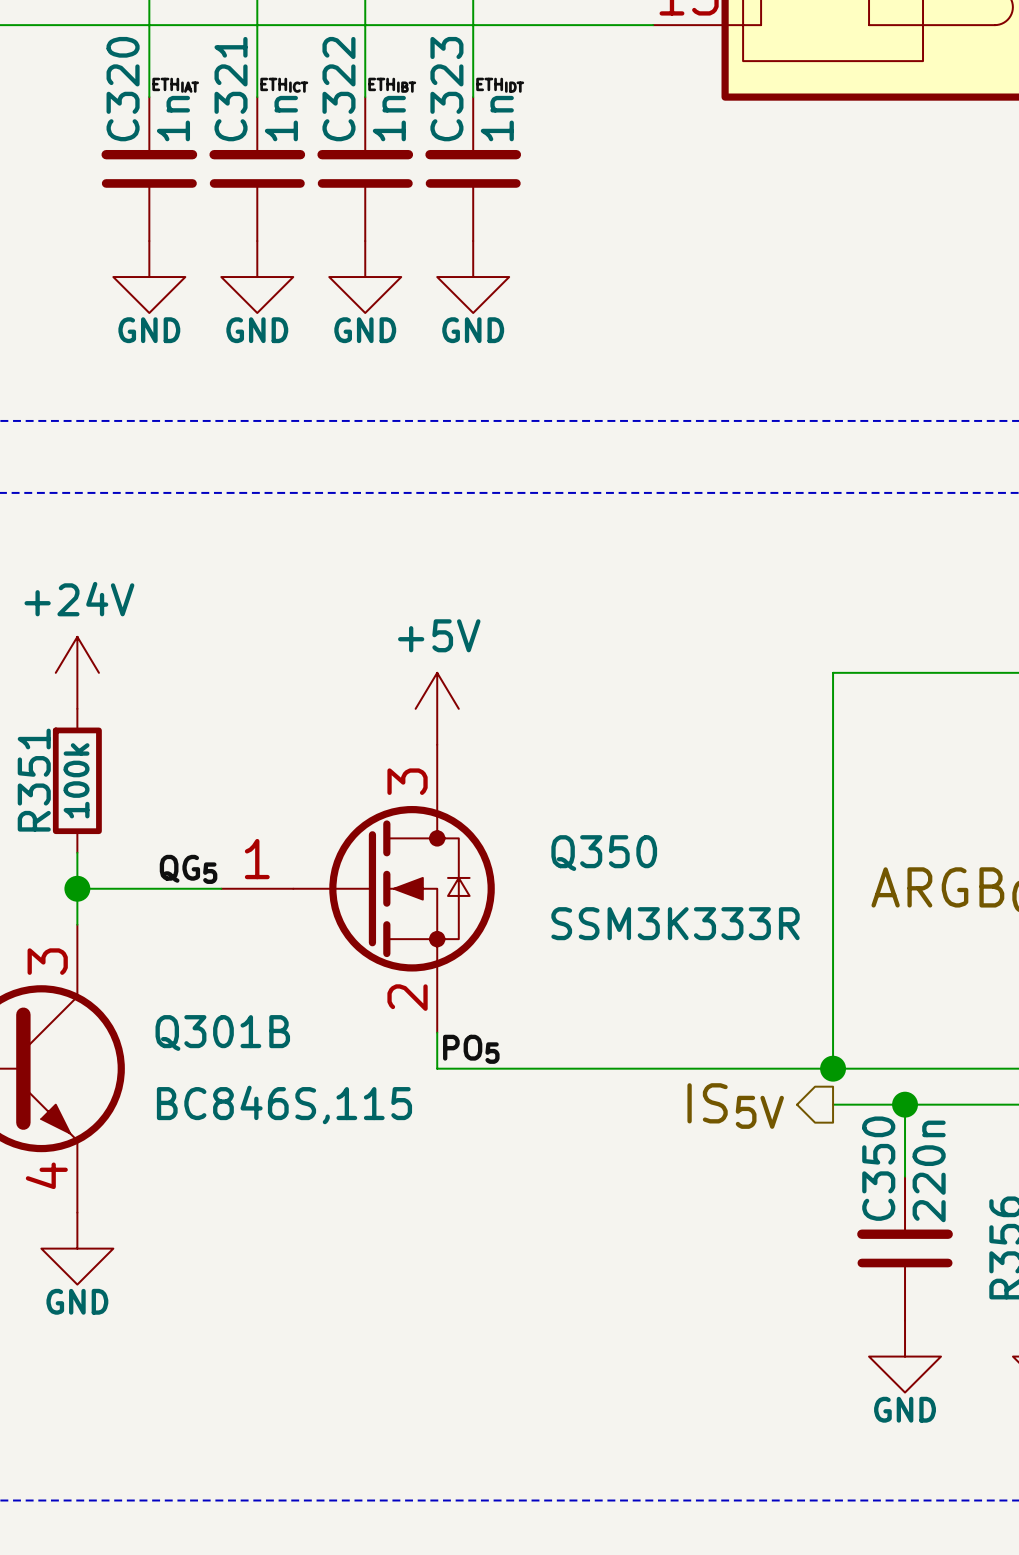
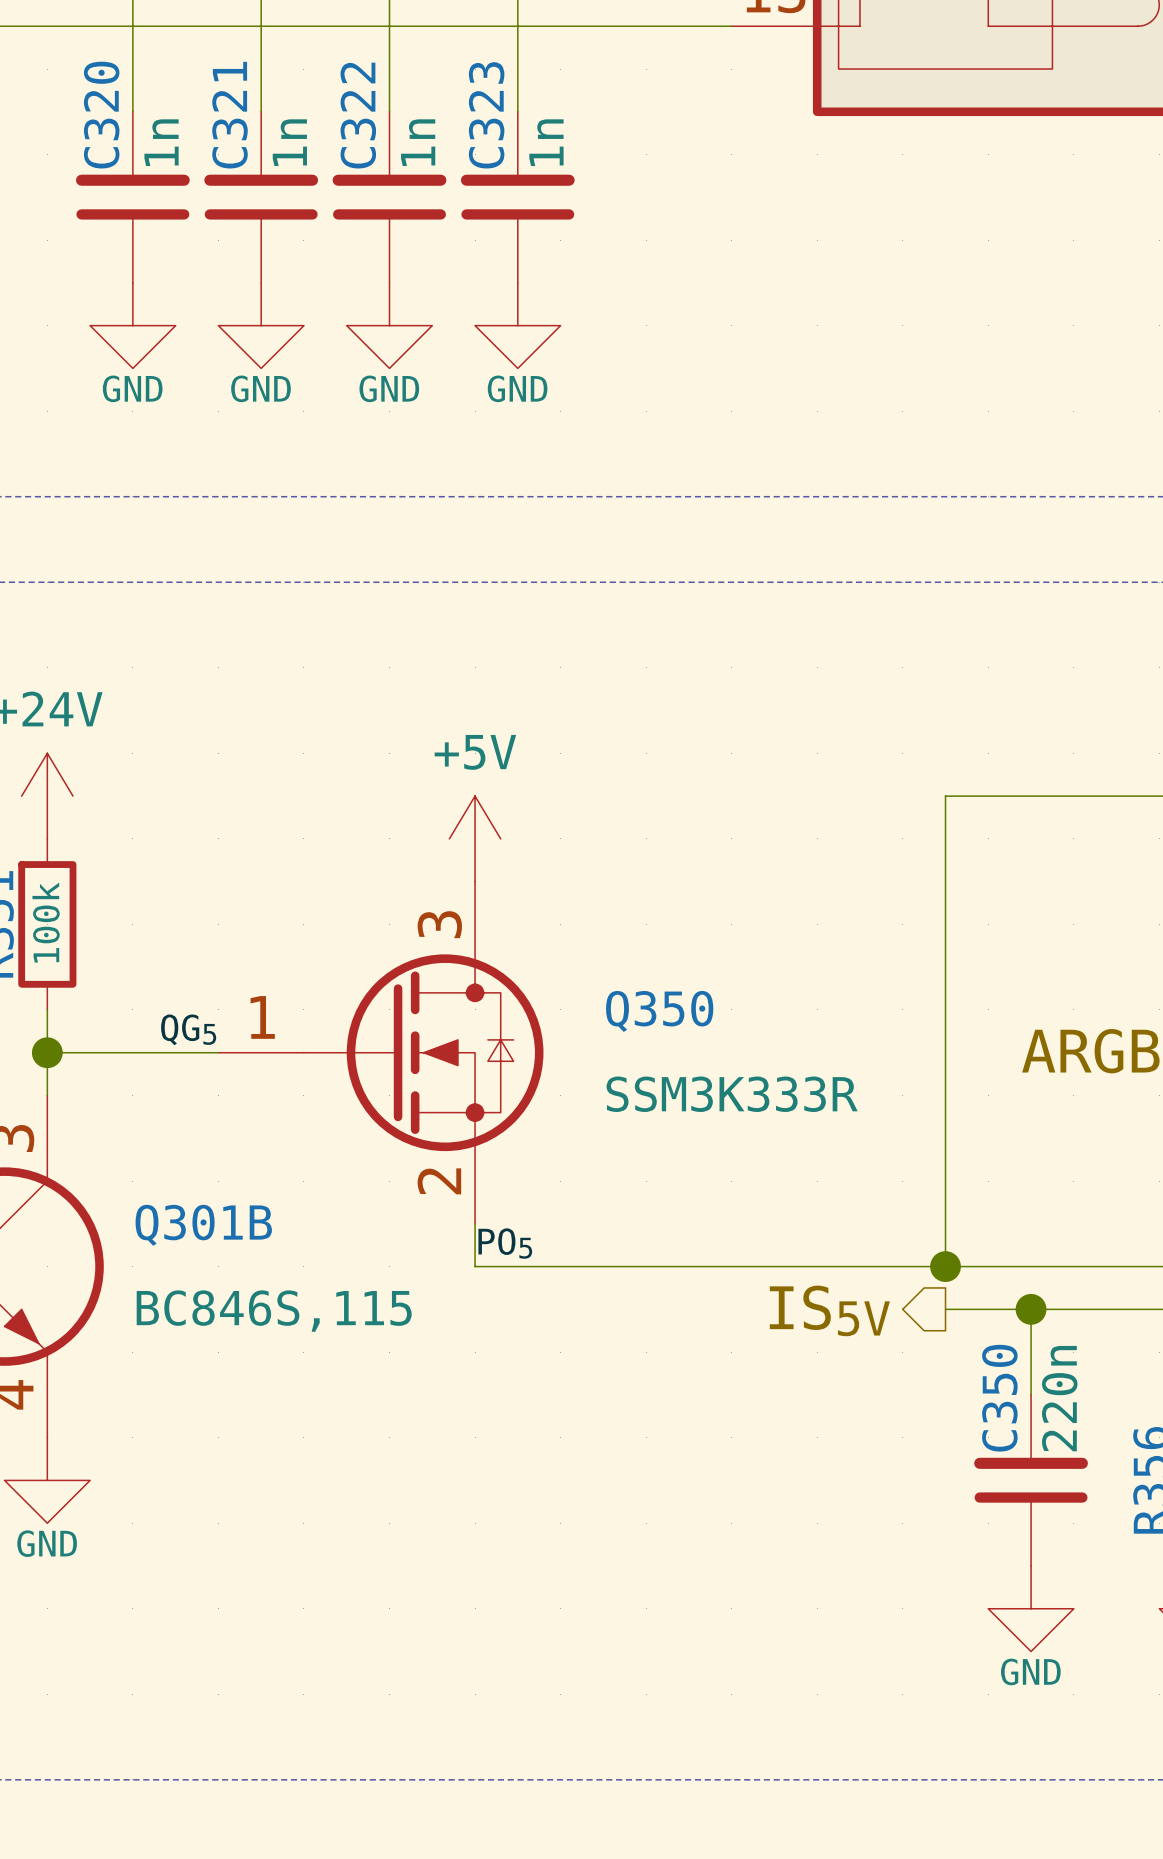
label: ETHIAT (175, 85) -> none
label: ETHICT (284, 85) -> none
label: ETHIBT (392, 85) -> none
label: ETHIDT (500, 85) -> none

